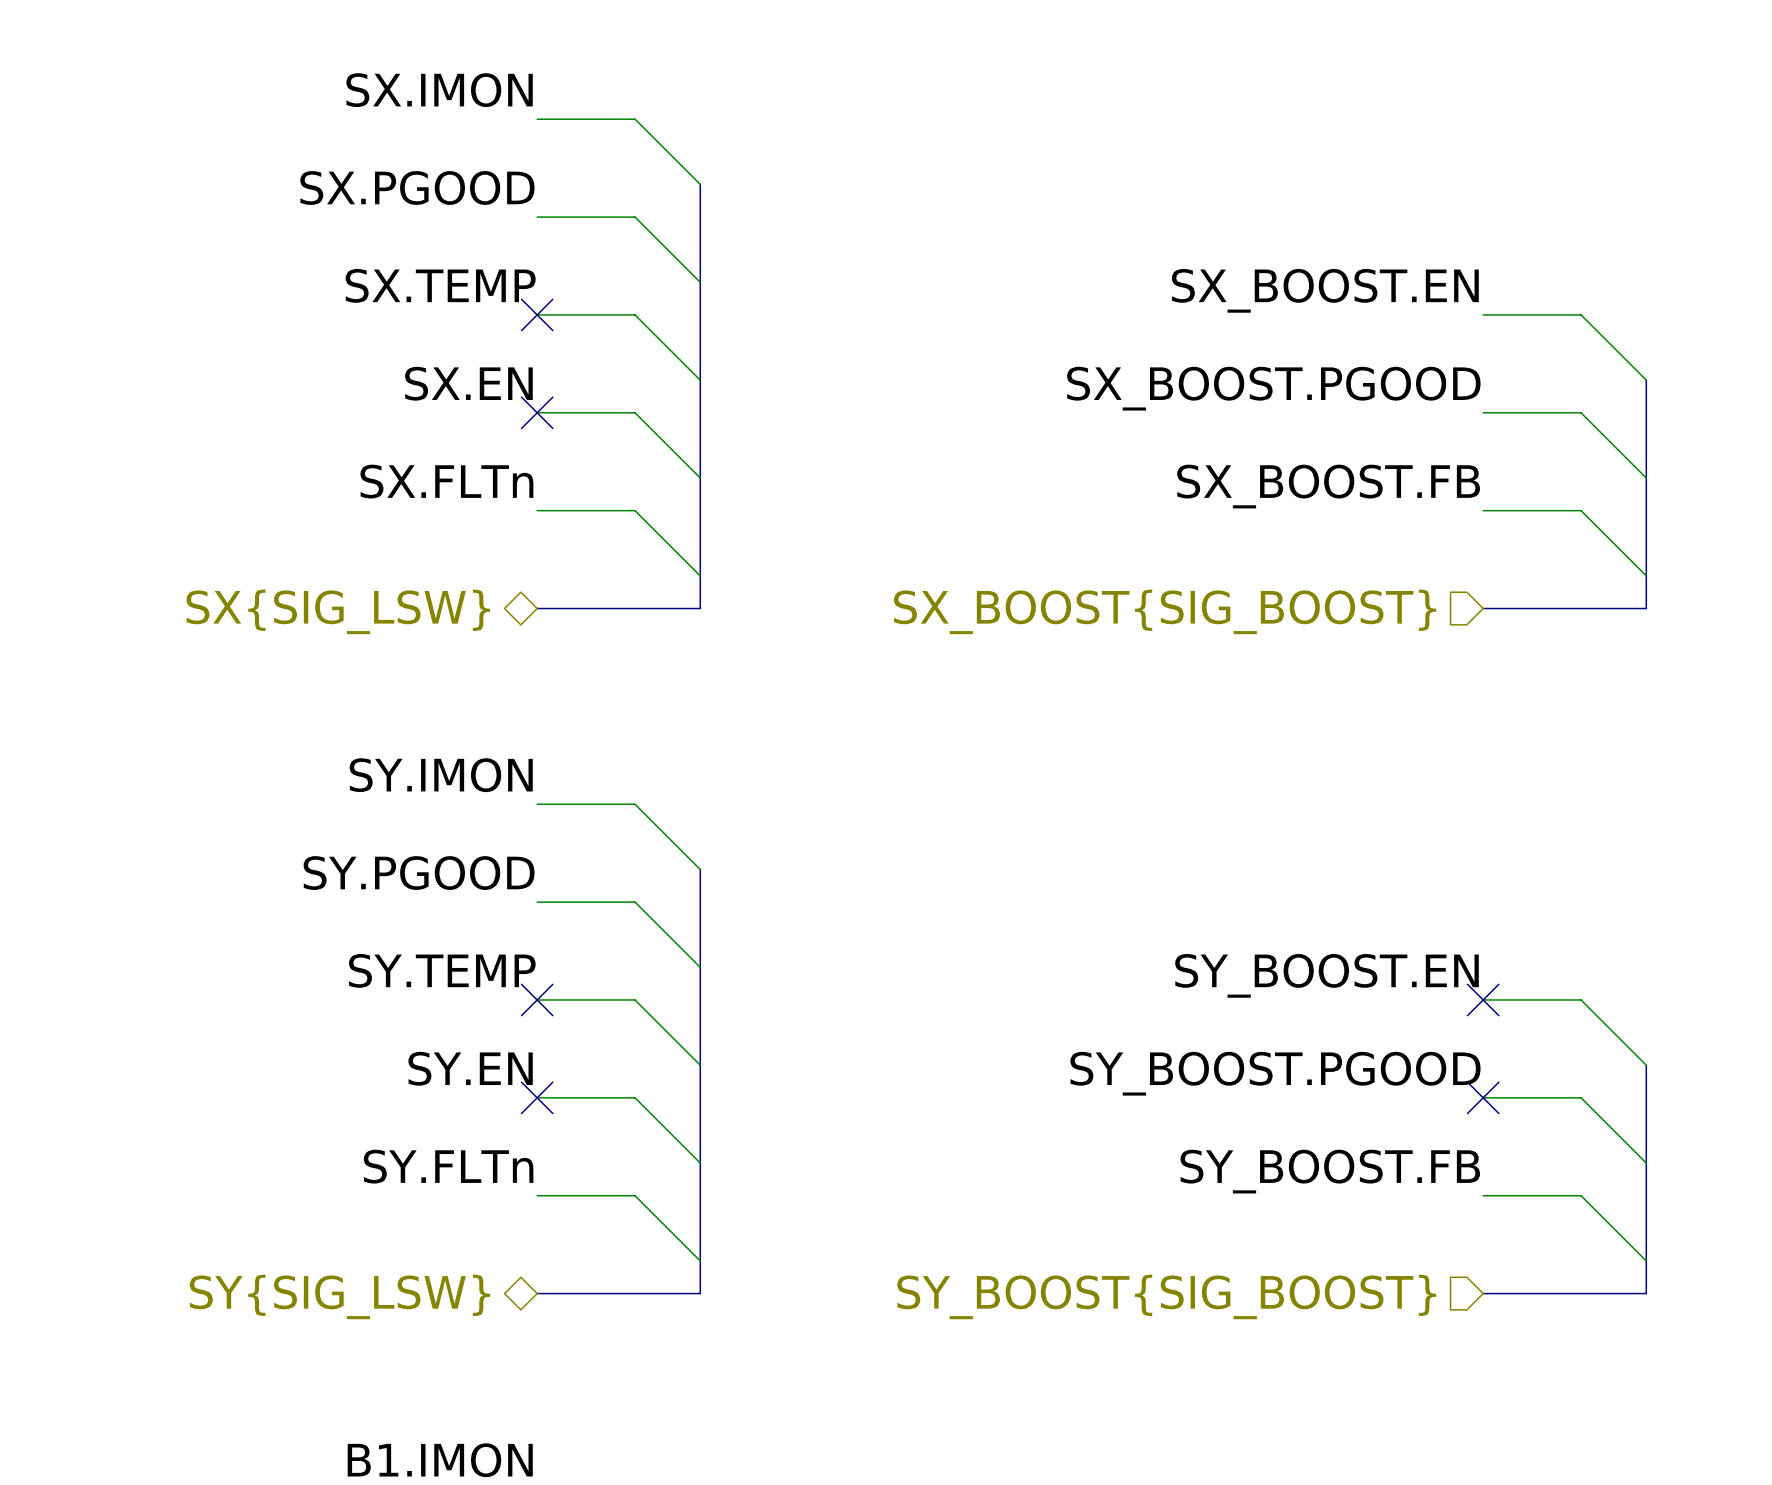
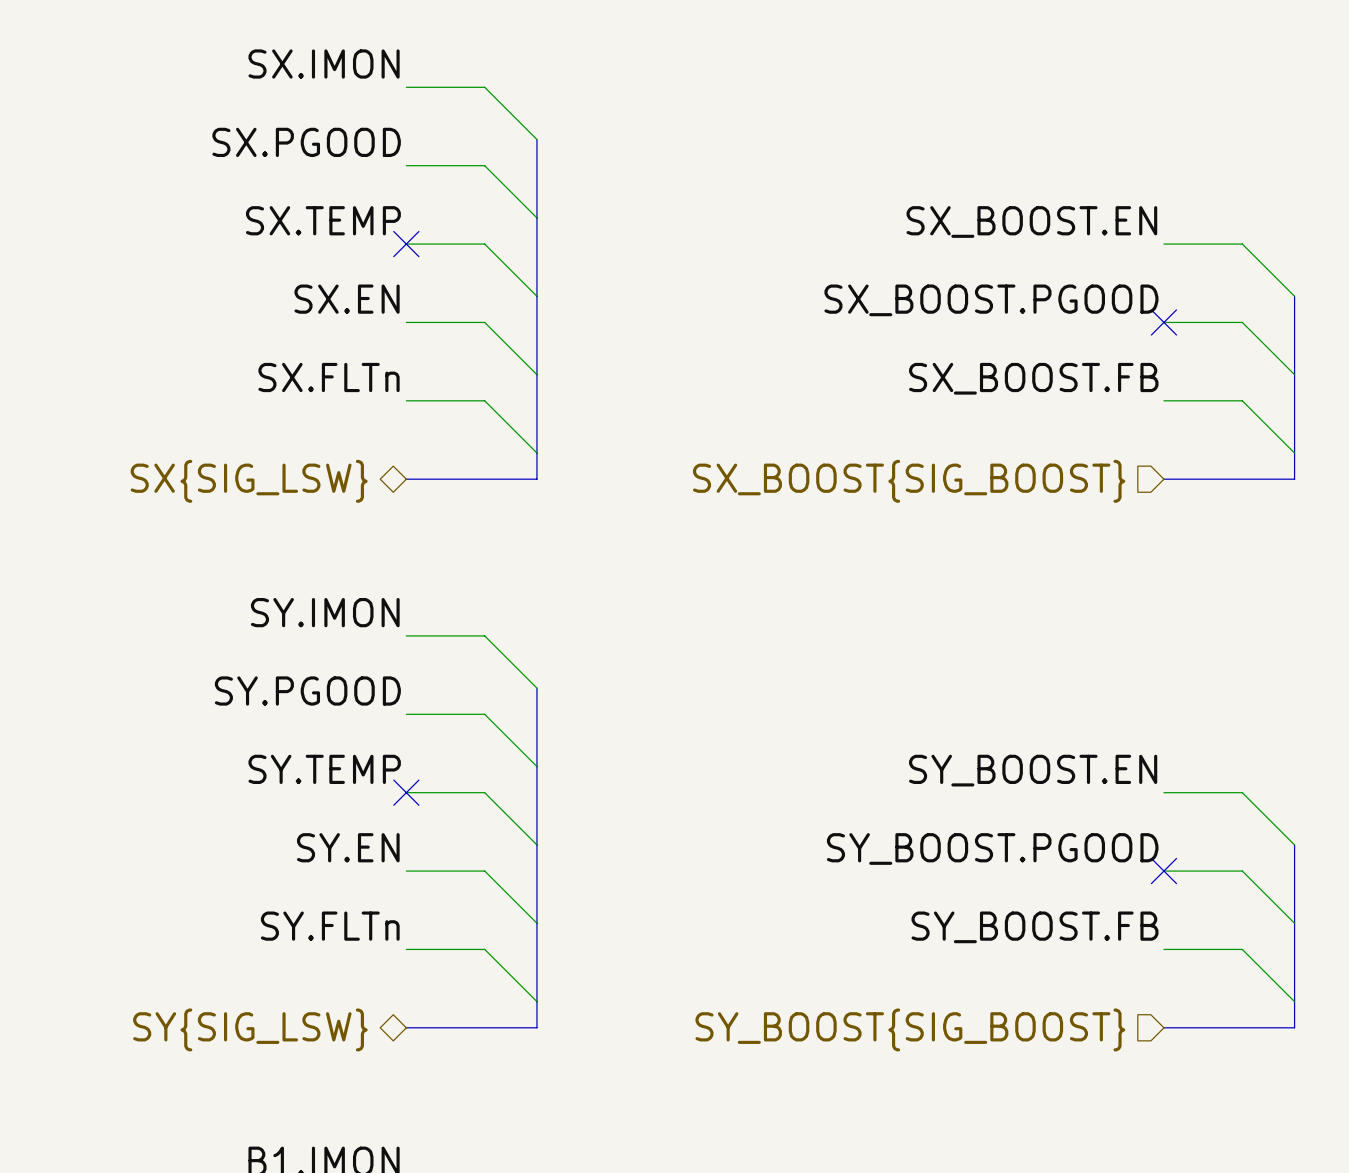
no-connect mark: (537, 412) -> none
no-connect mark: none -> (1163, 322)
no-connect mark: (1483, 999) -> none
no-connect mark: (537, 1097) -> none

